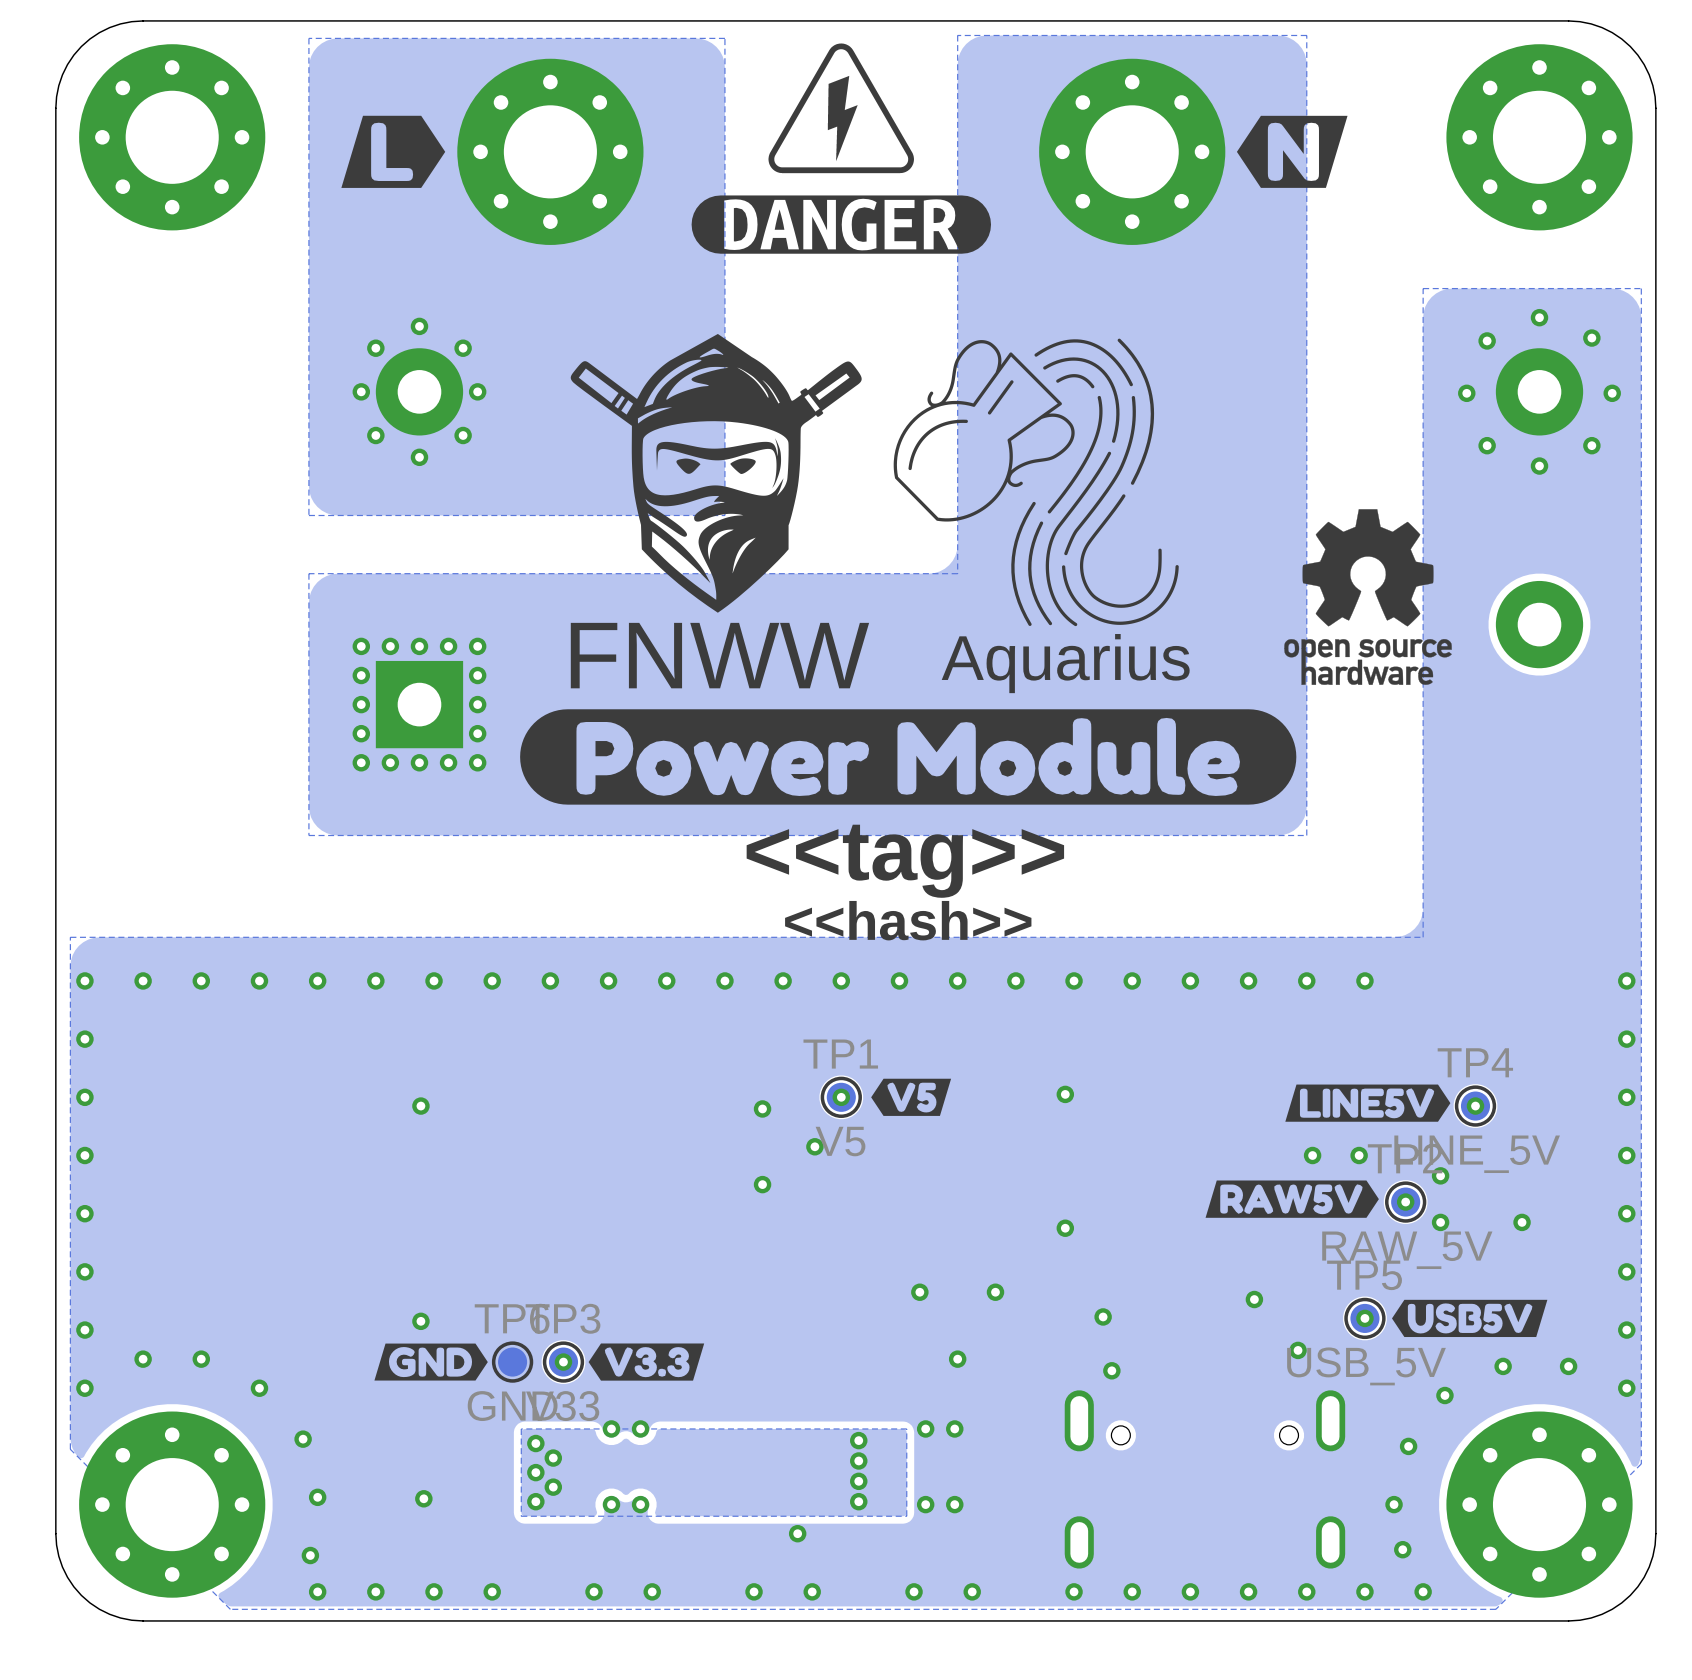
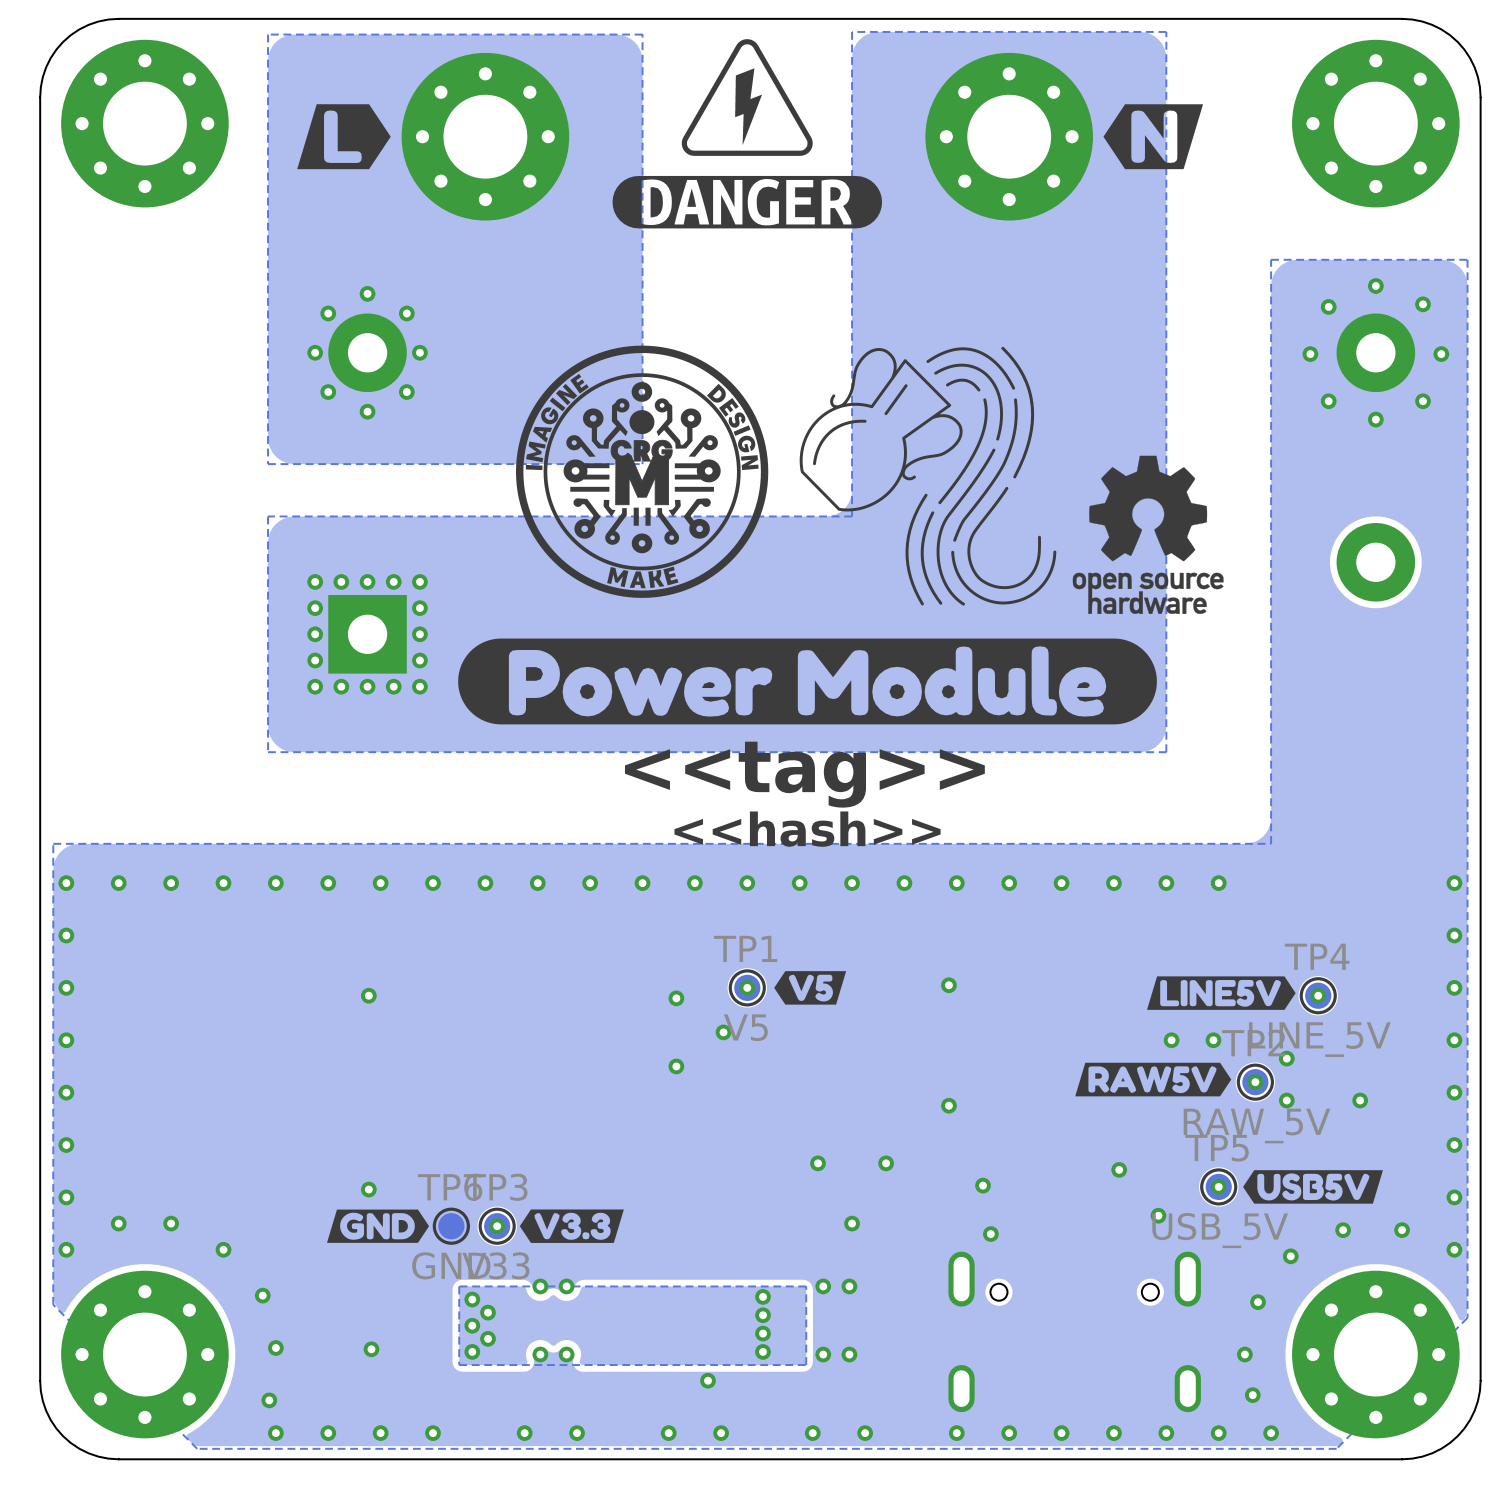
drawing: [570, 333, 862, 613] -> none
drawing: none -> [515, 345, 769, 598]
drawing position: (1036, 482) -> (928, 476)
drawing position: (1368, 597) -> (1148, 534)
text: FNWW (719, 655) -> none
text: Aquarius (1065, 663) -> none

